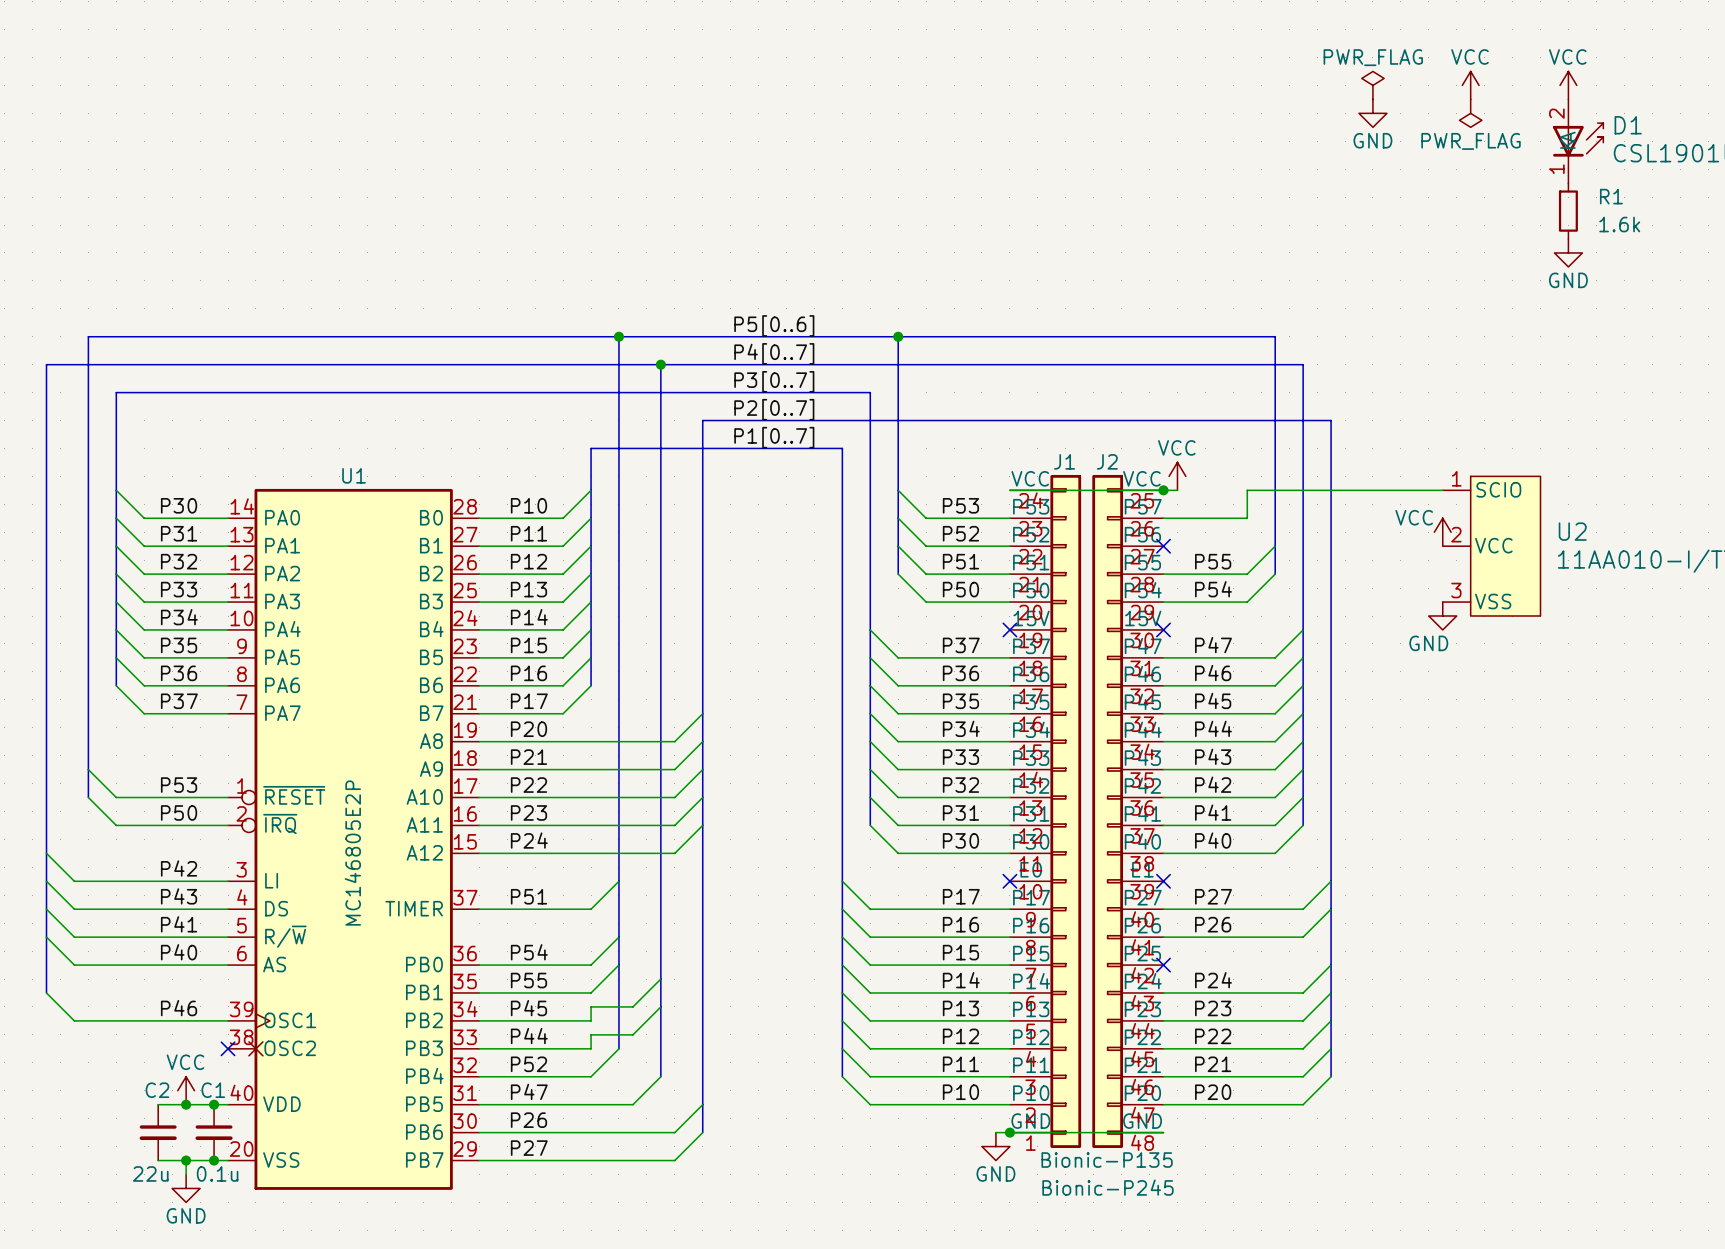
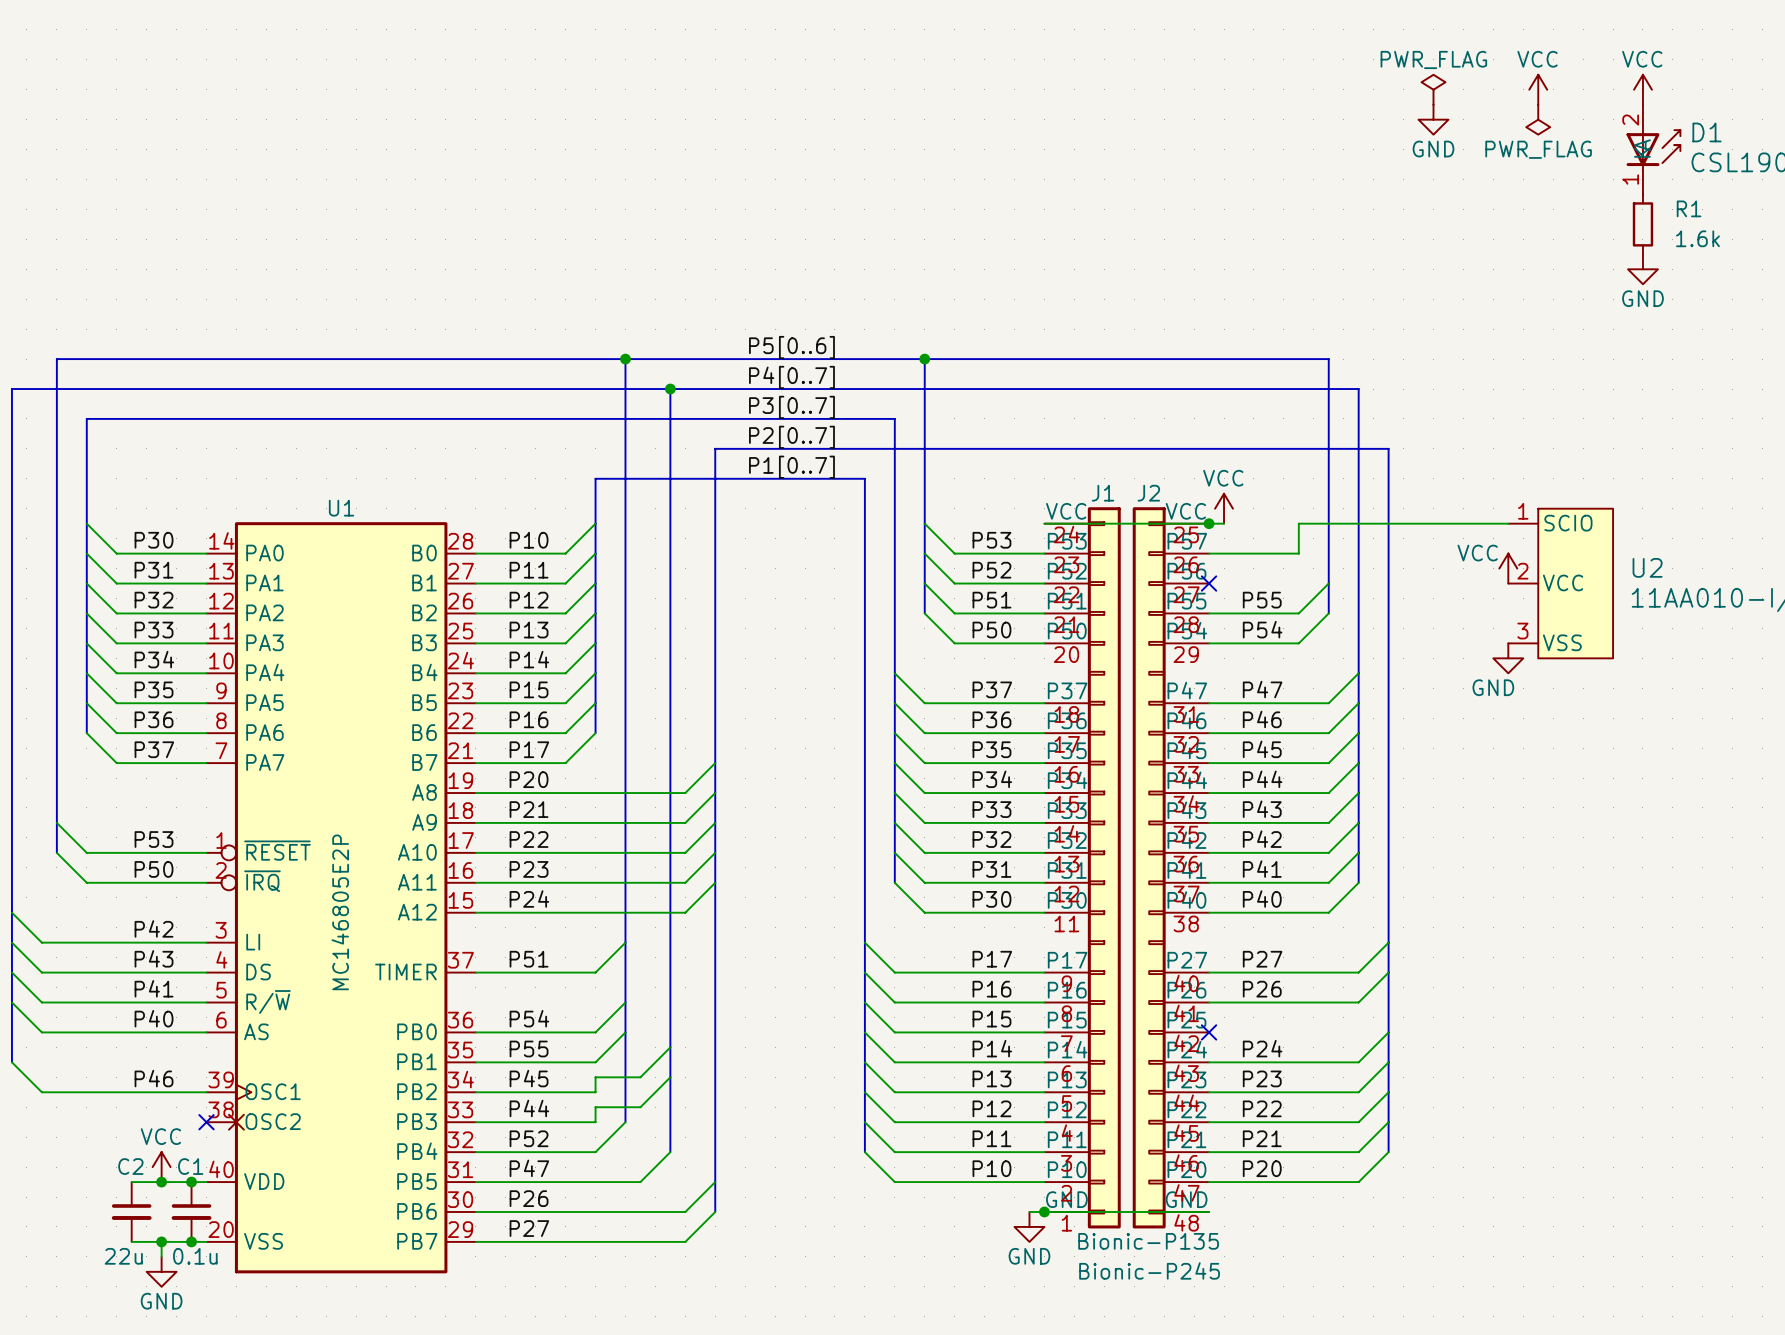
J1 symbol: [1009, 474, 1082, 1148] -> [1044, 507, 1121, 1229]
J2 symbol: [1092, 474, 1164, 1148] -> [1132, 507, 1210, 1229]
no-connect mark: (1009, 629) -> none
no-connect mark: (1163, 629) -> none
no-connect mark: (1009, 881) -> none
no-connect mark: (1163, 881) -> none

